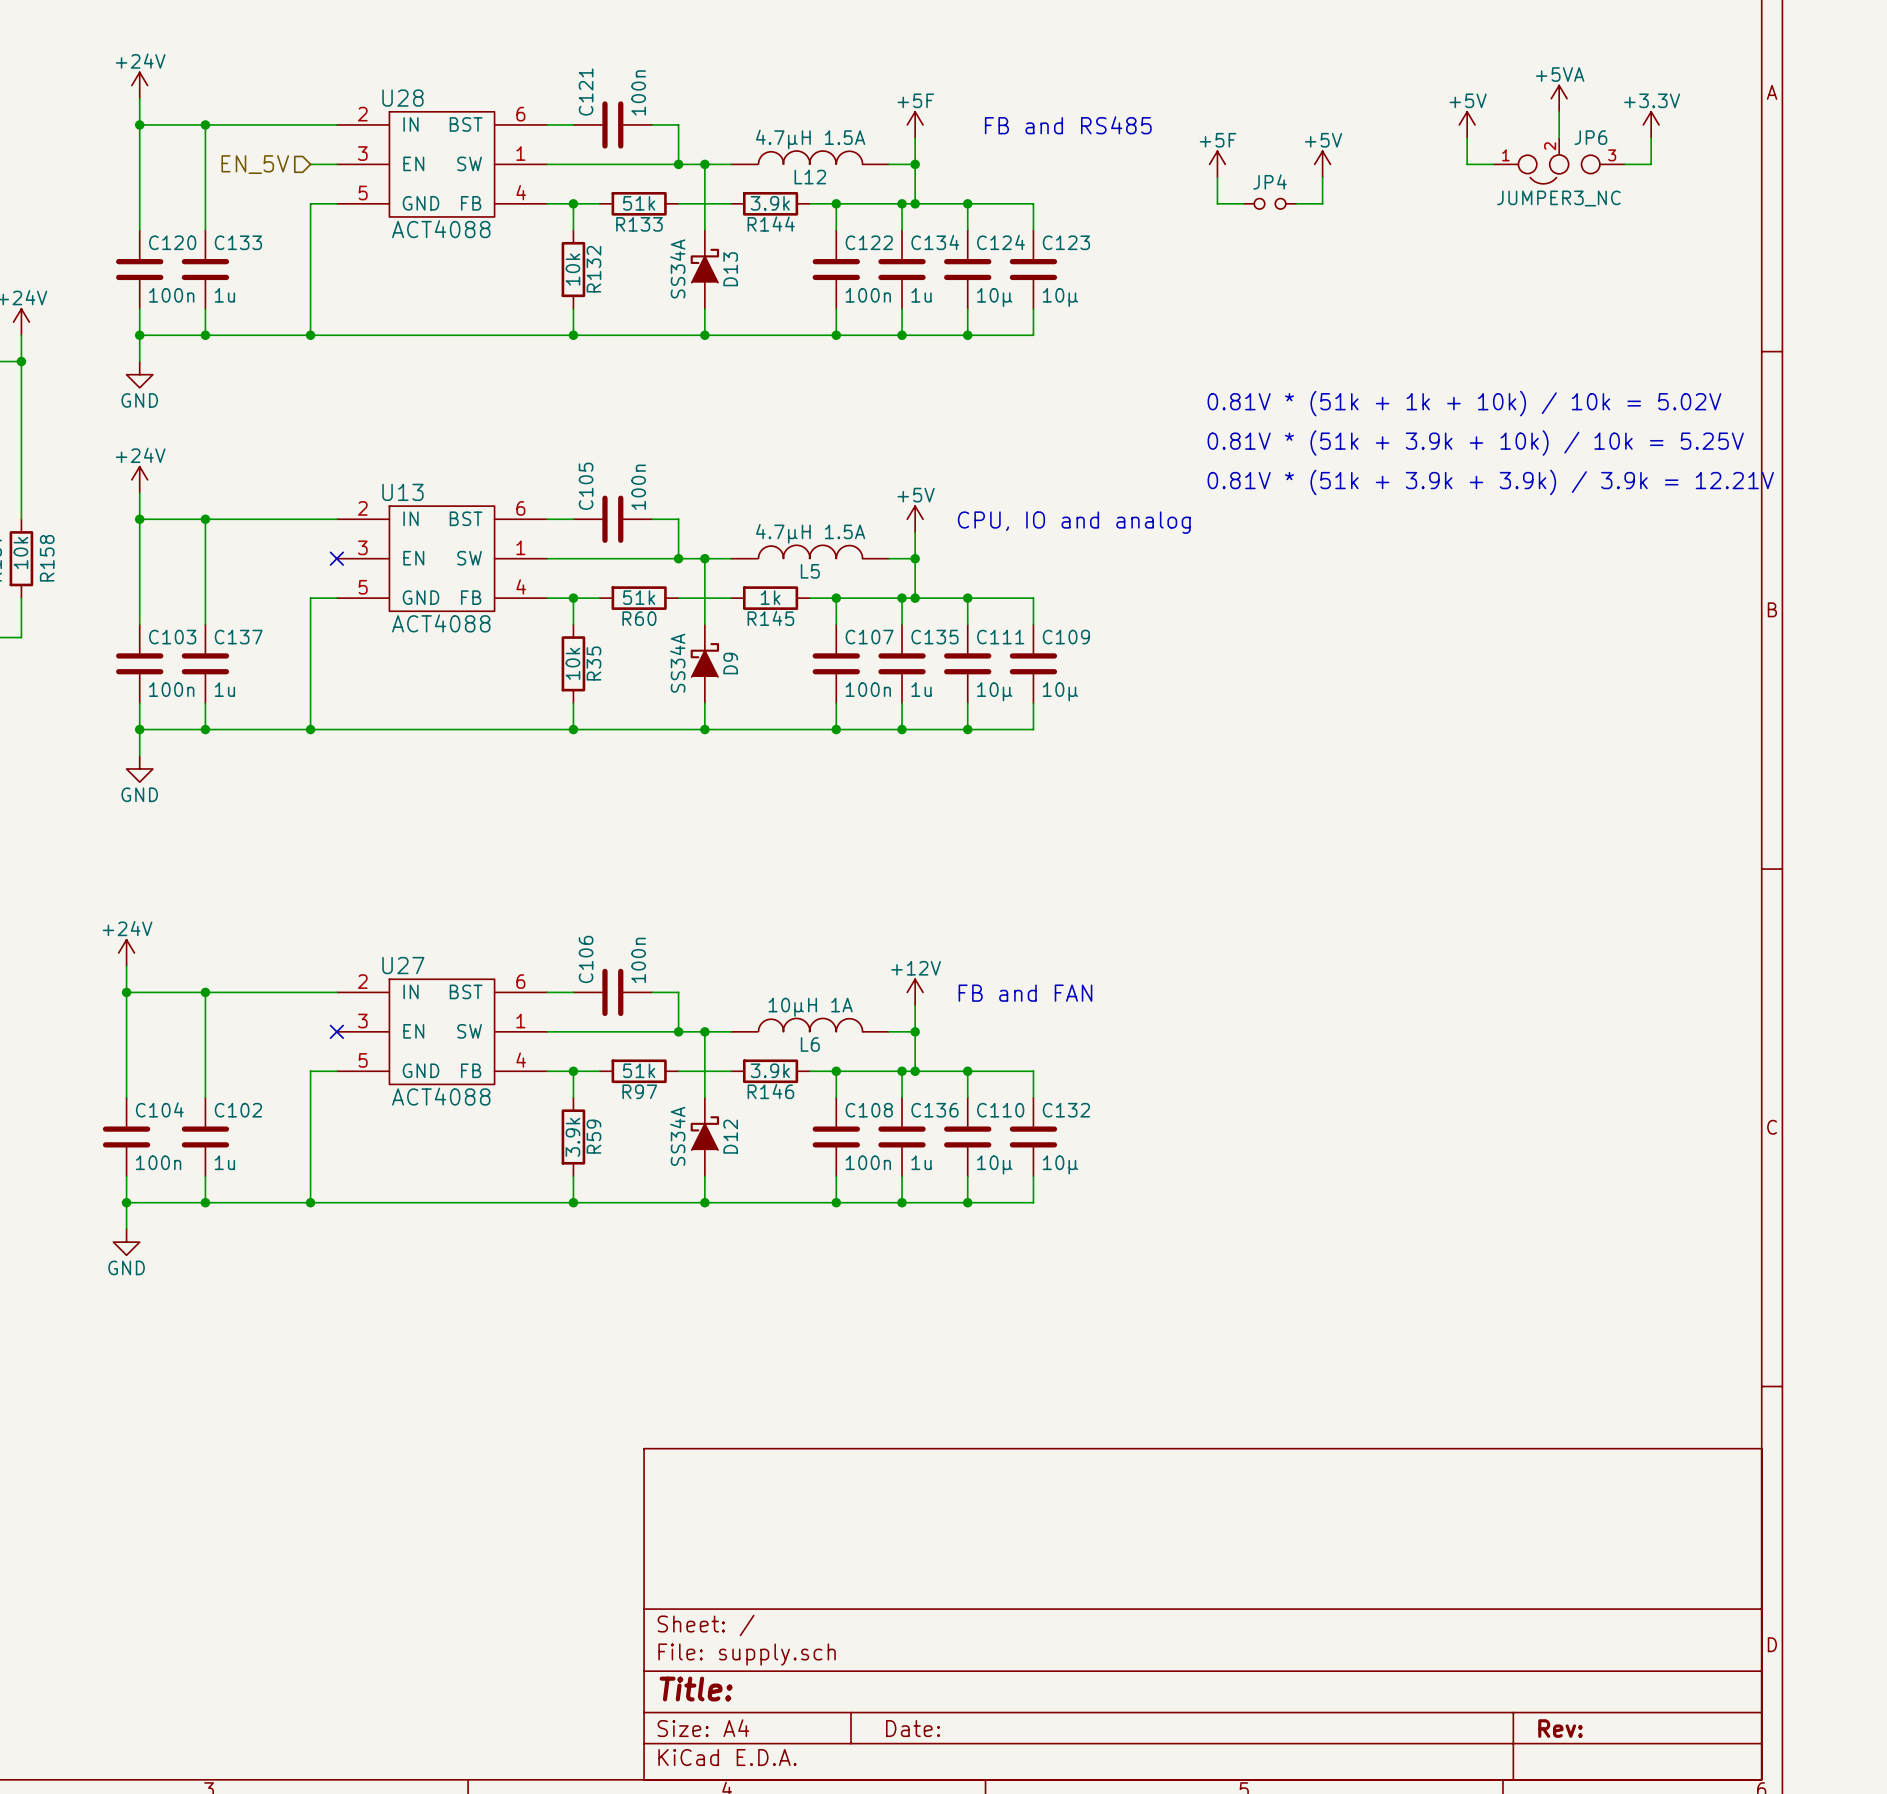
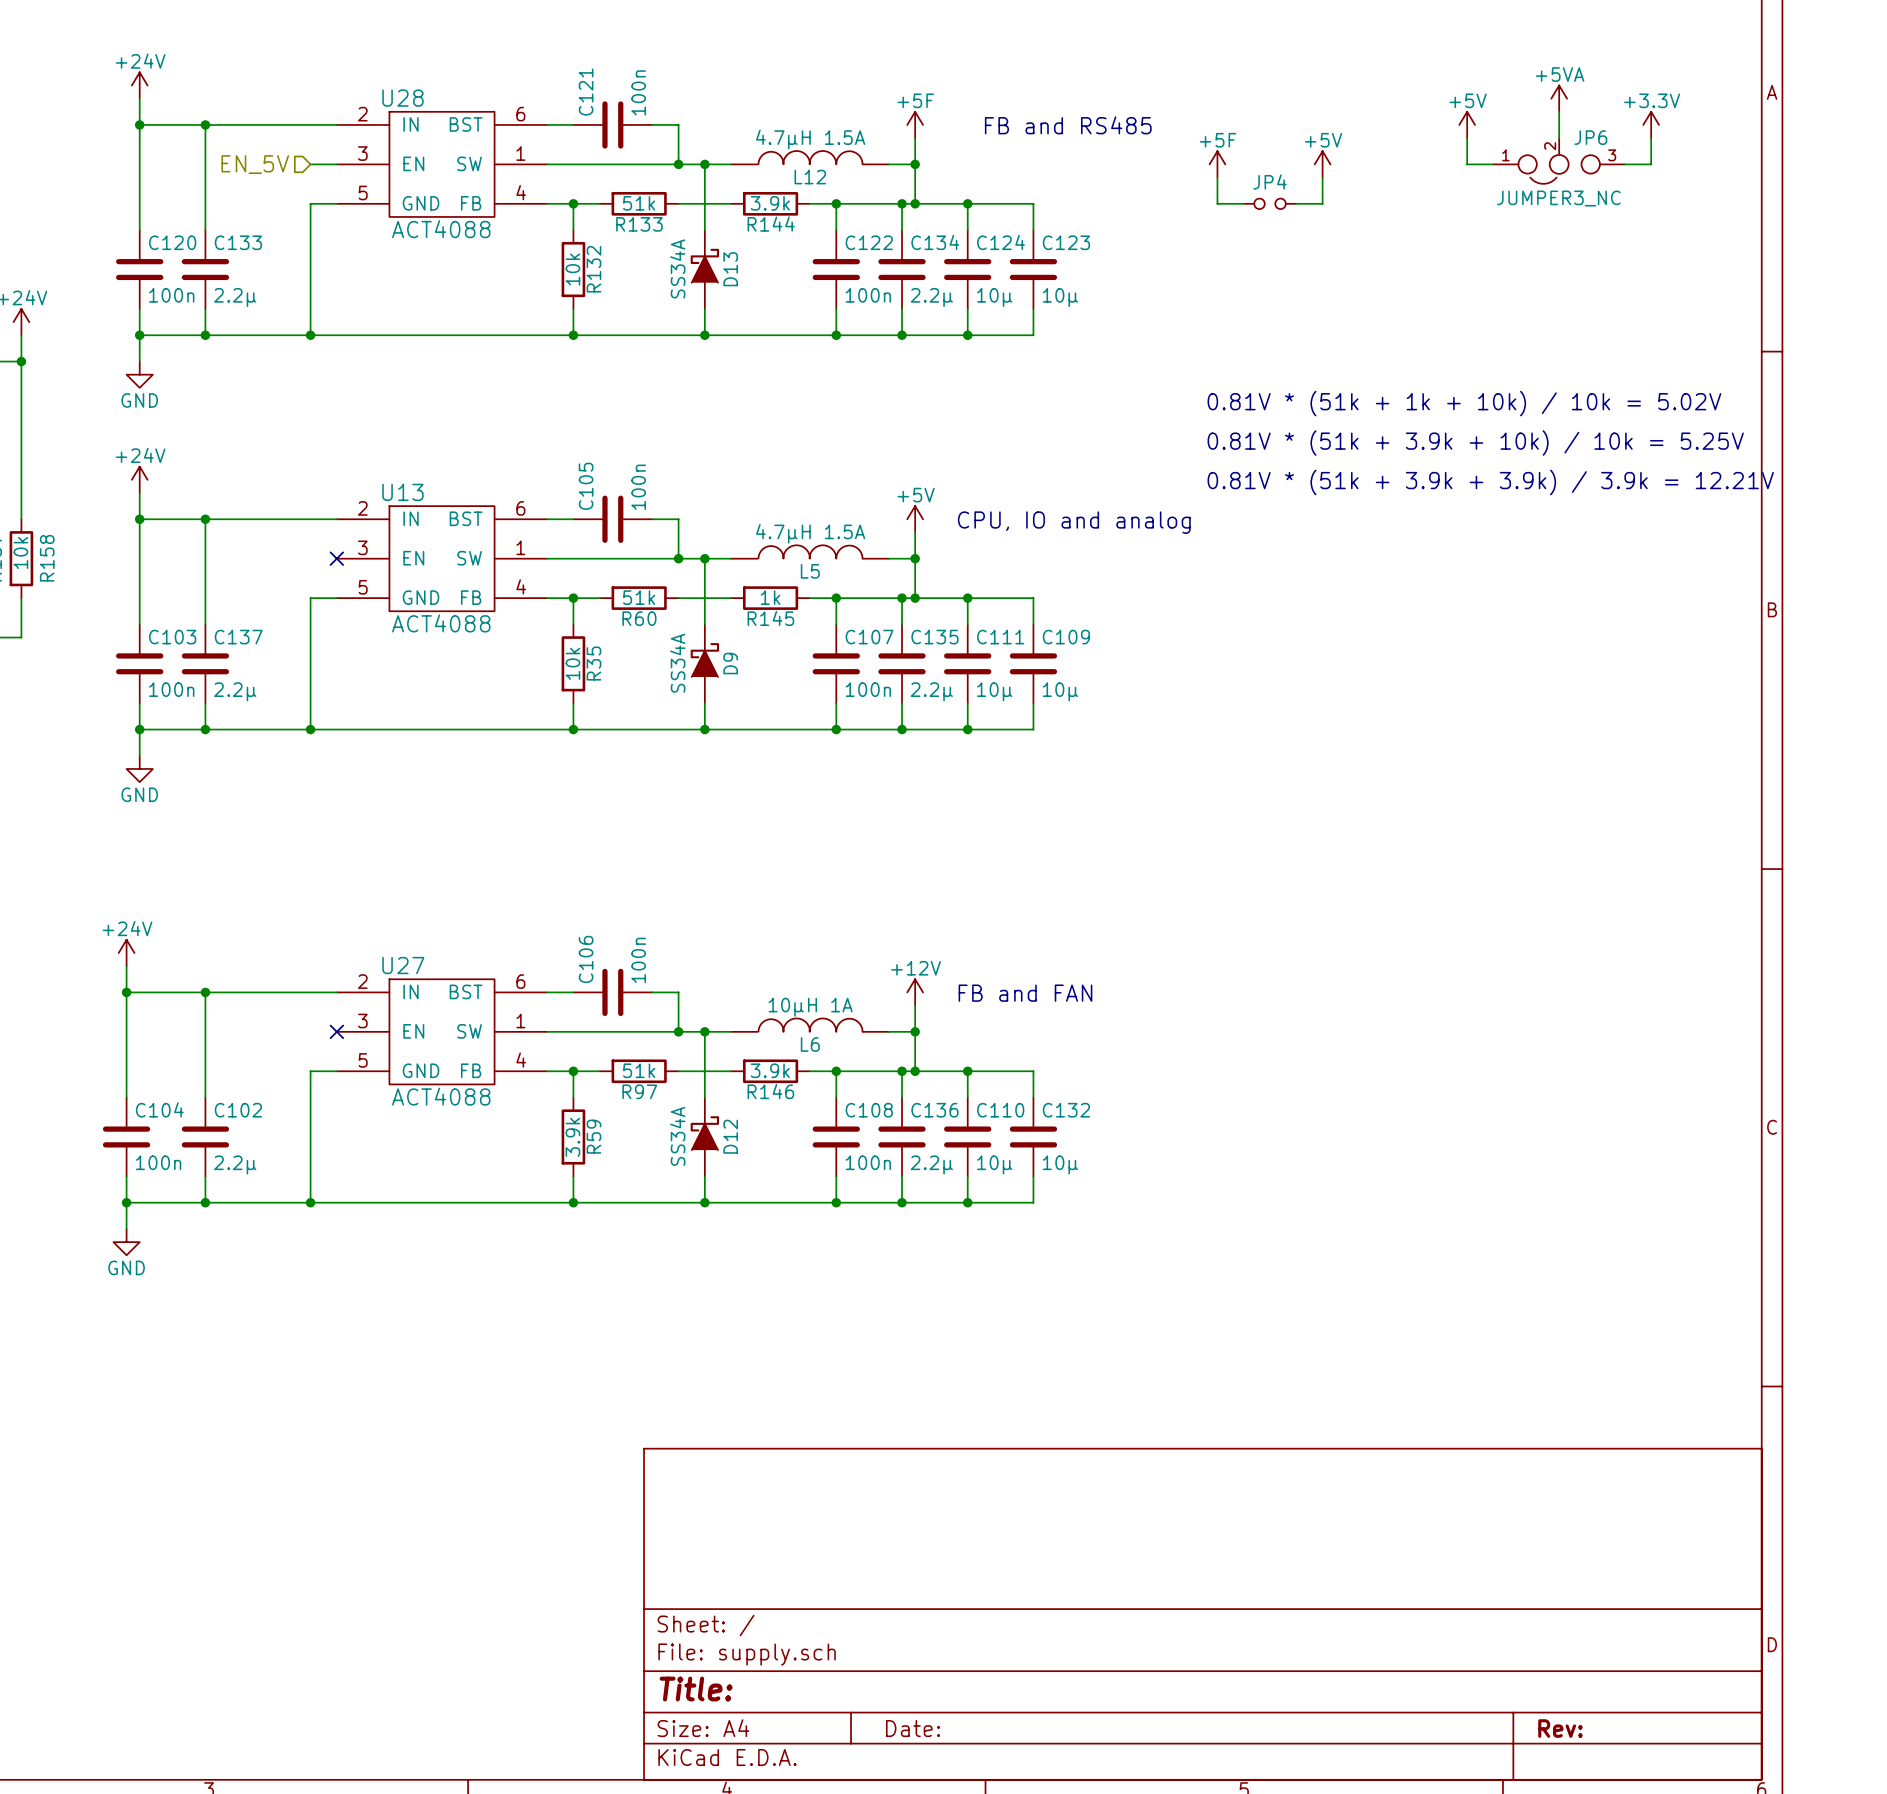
C133 value: 1u (224, 295) -> 2.2µ (235, 297)
C134 value: 1u (921, 295) -> 2.2µ (931, 297)
C137 value: 1u (224, 689) -> 2.2µ (235, 691)
C135 value: 1u (921, 689) -> 2.2µ (931, 691)
C102 value: 1u (224, 1162) -> 2.2µ (235, 1164)
C136 value: 1u (921, 1162) -> 2.2µ (931, 1164)

